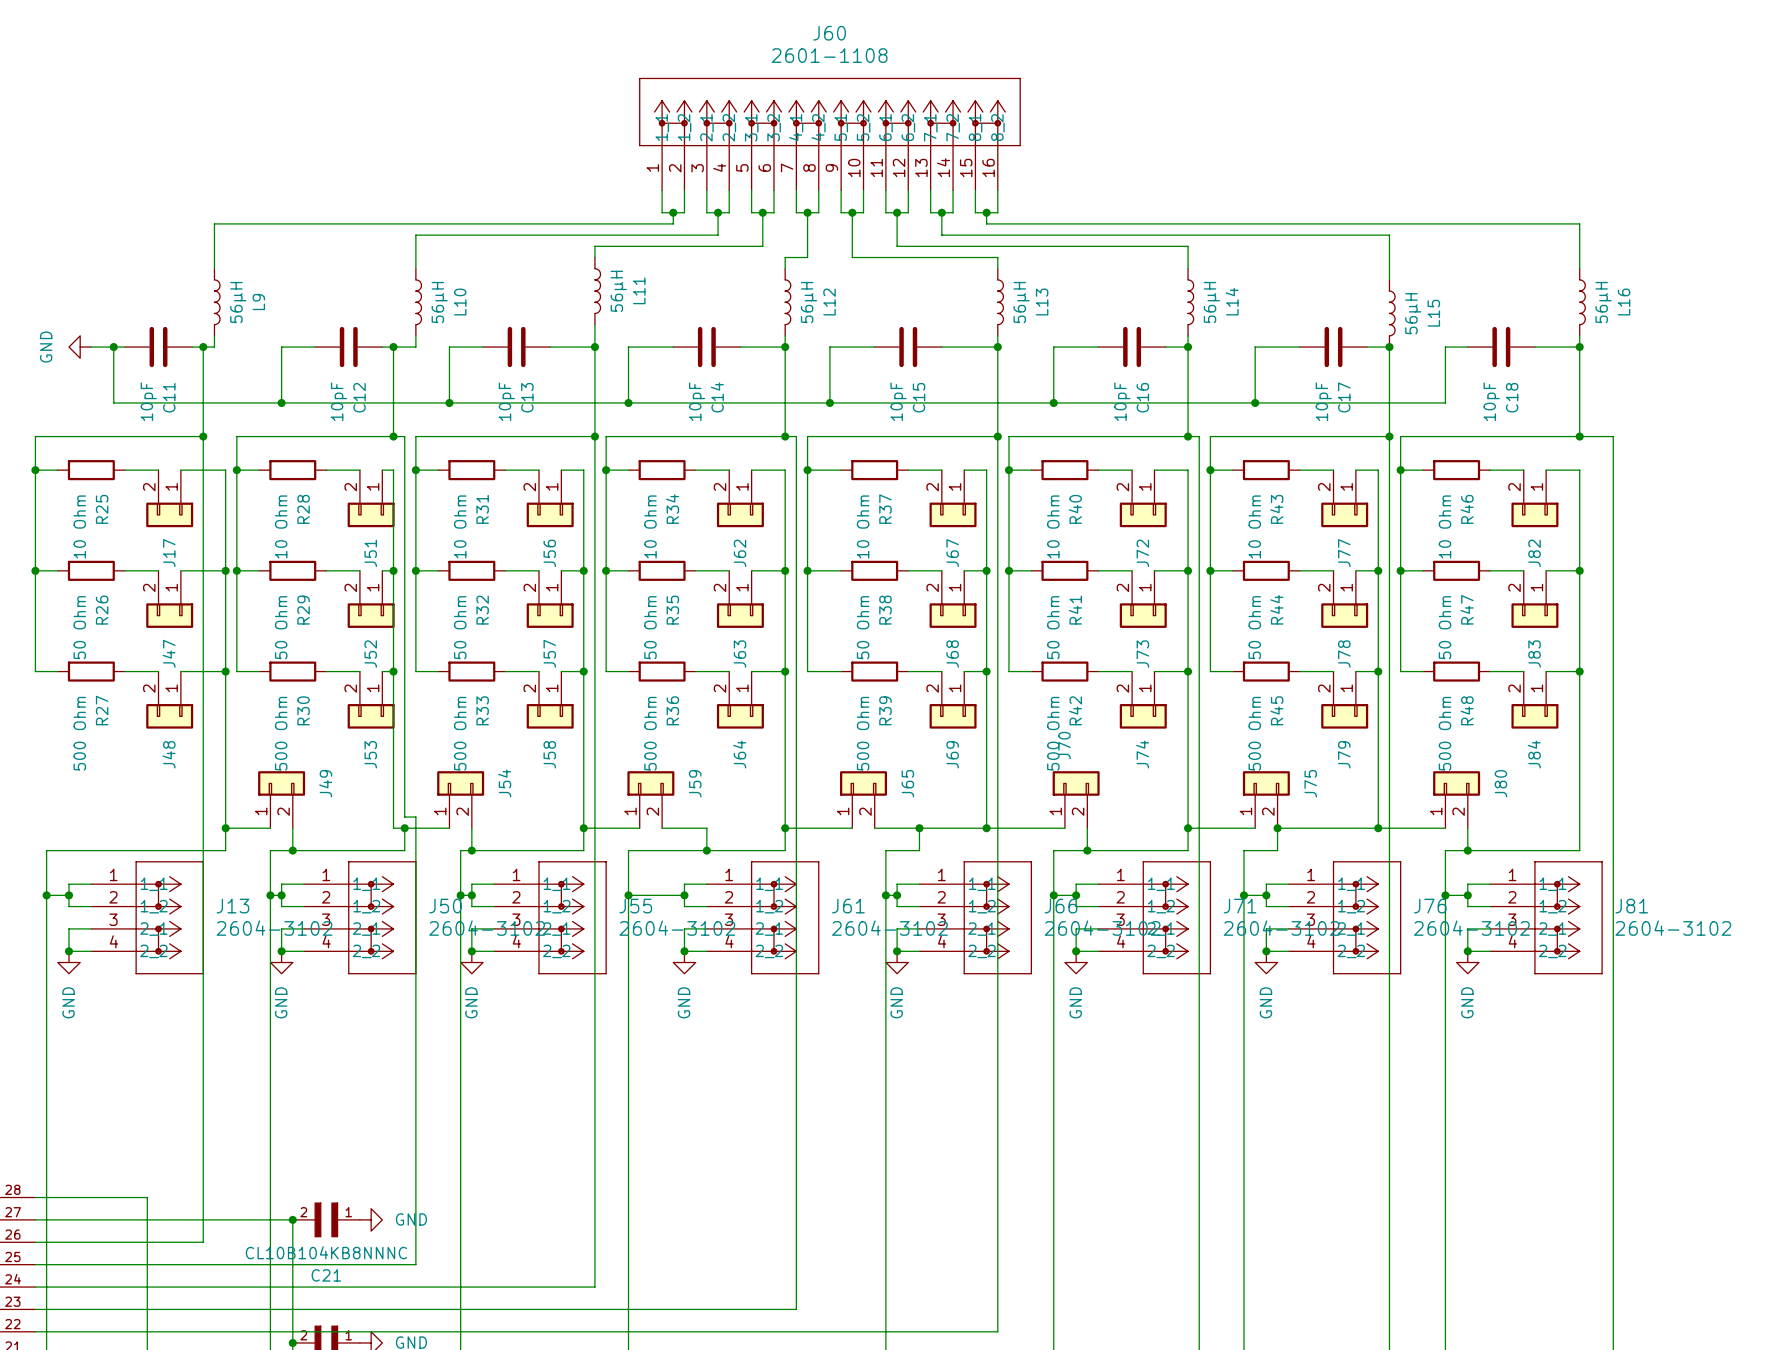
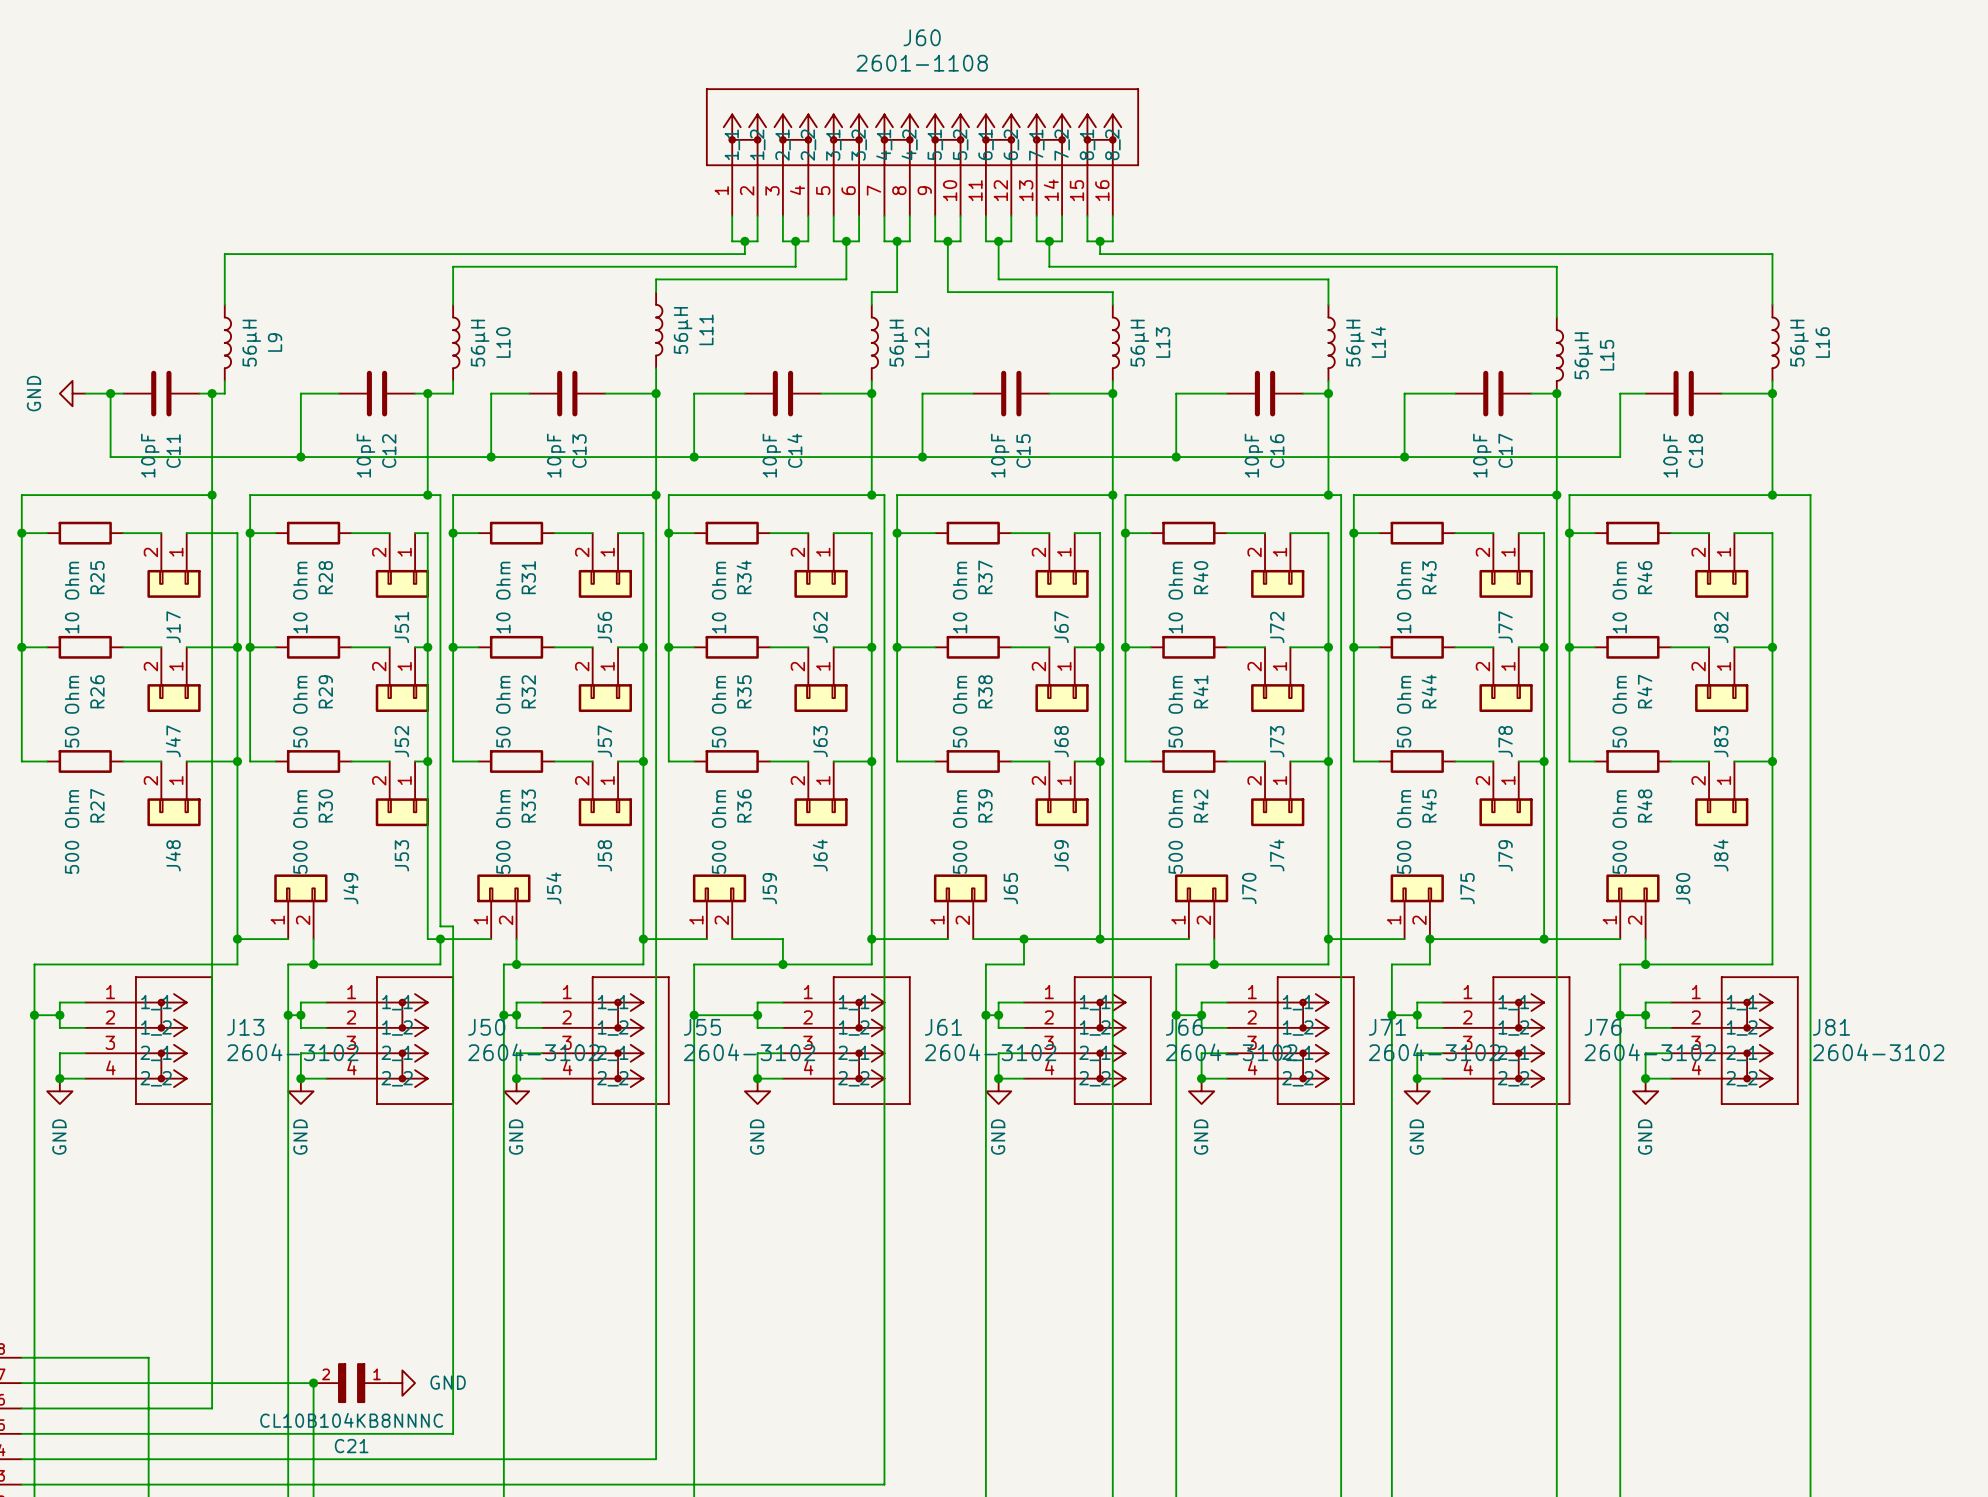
J70 name position: J70 (1064, 745) -> J70 (1249, 888)

